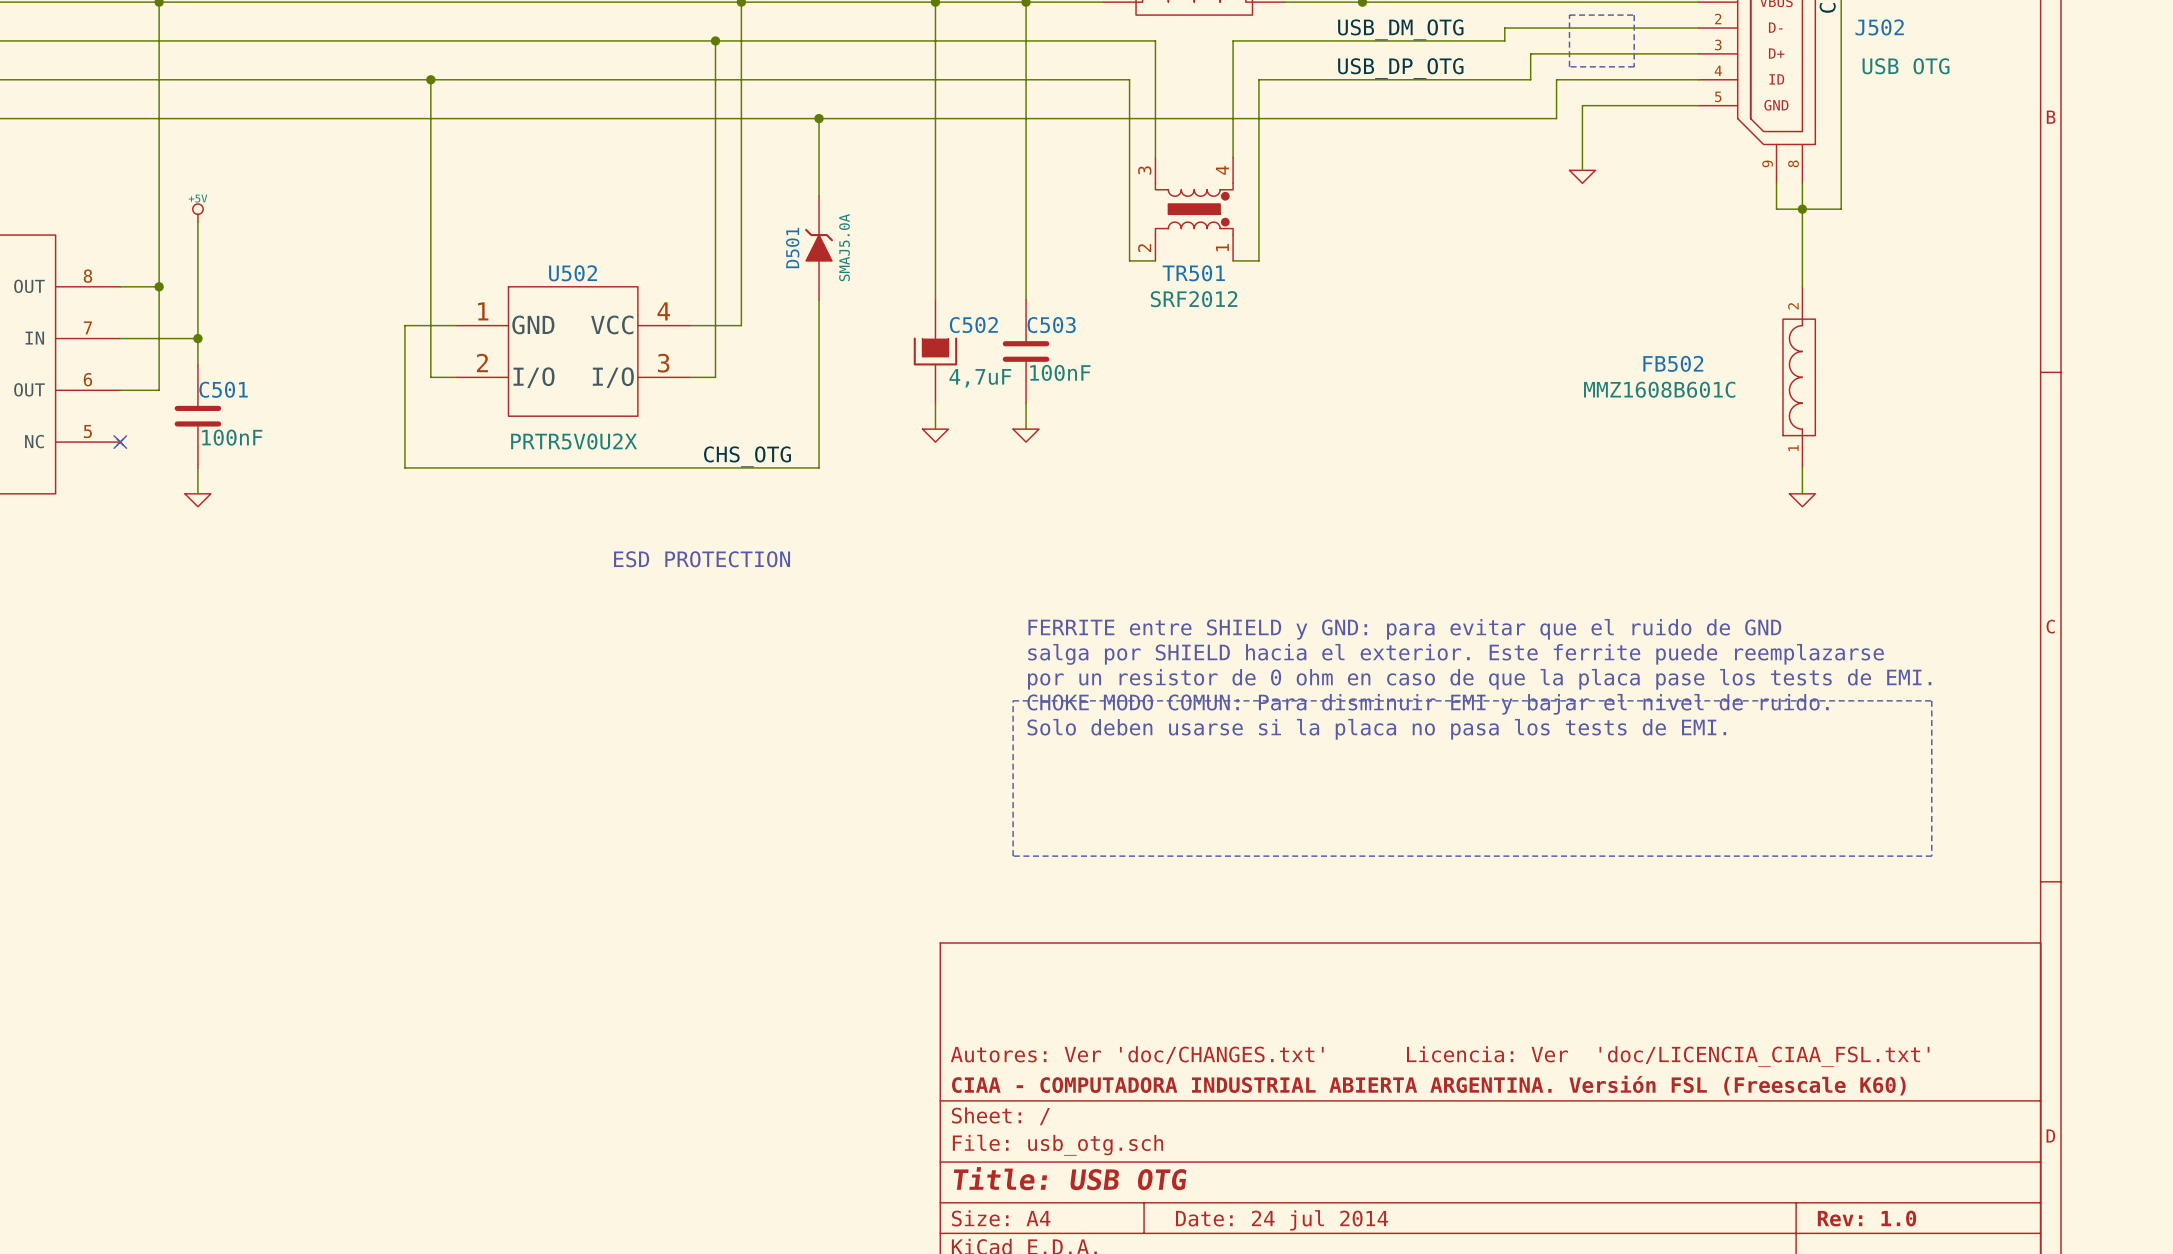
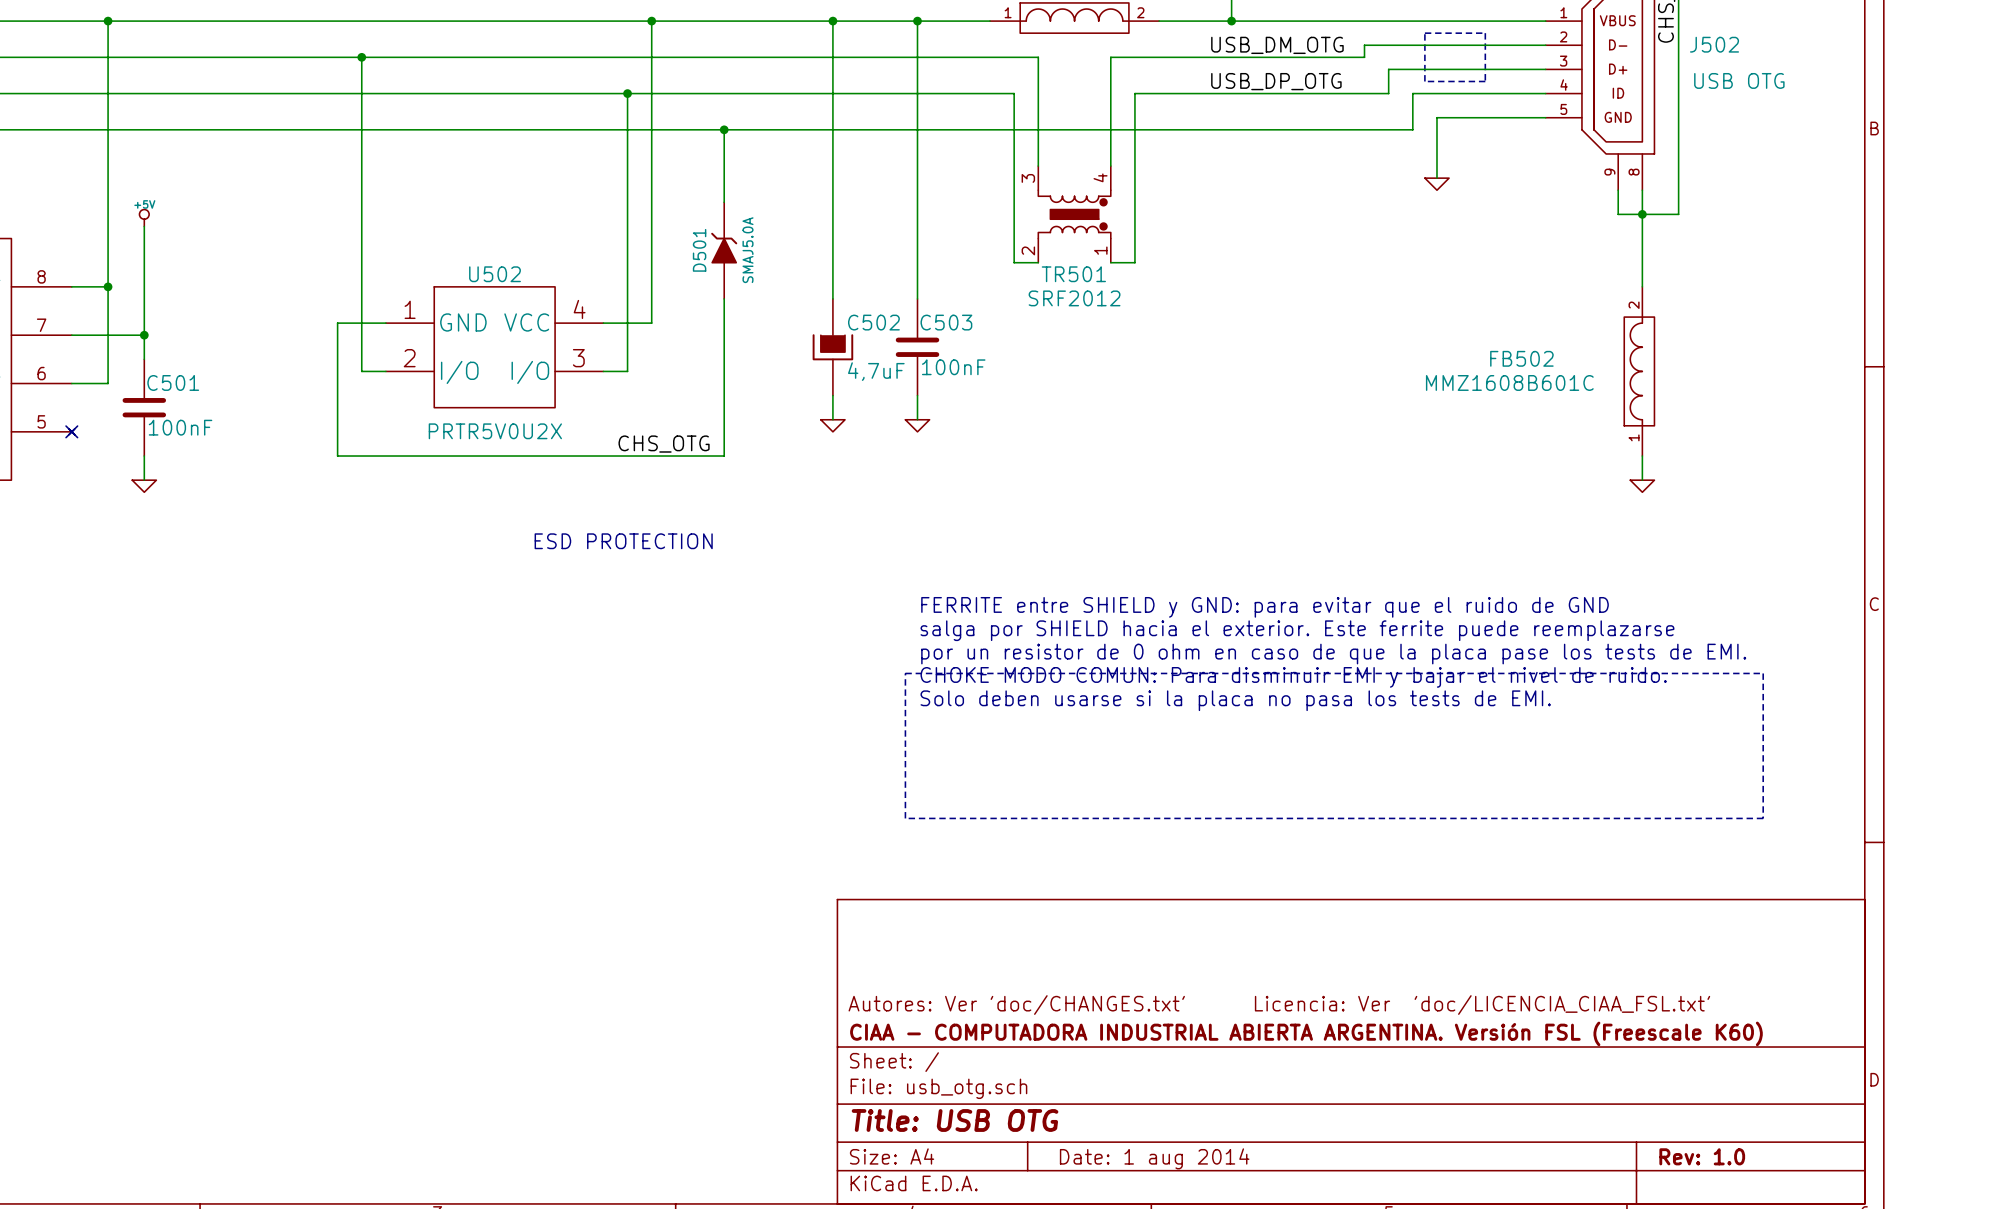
wire: none -> (361, 57) (361, 93)
wire: (715, 40) (715, 79) -> none
junction position: (715, 40) -> (627, 93)
junction position: (430, 79) -> (361, 57)
title block: Date: 24 jul 2014 (1282, 1220) -> Date: 1 aug 2014 (1154, 1158)

